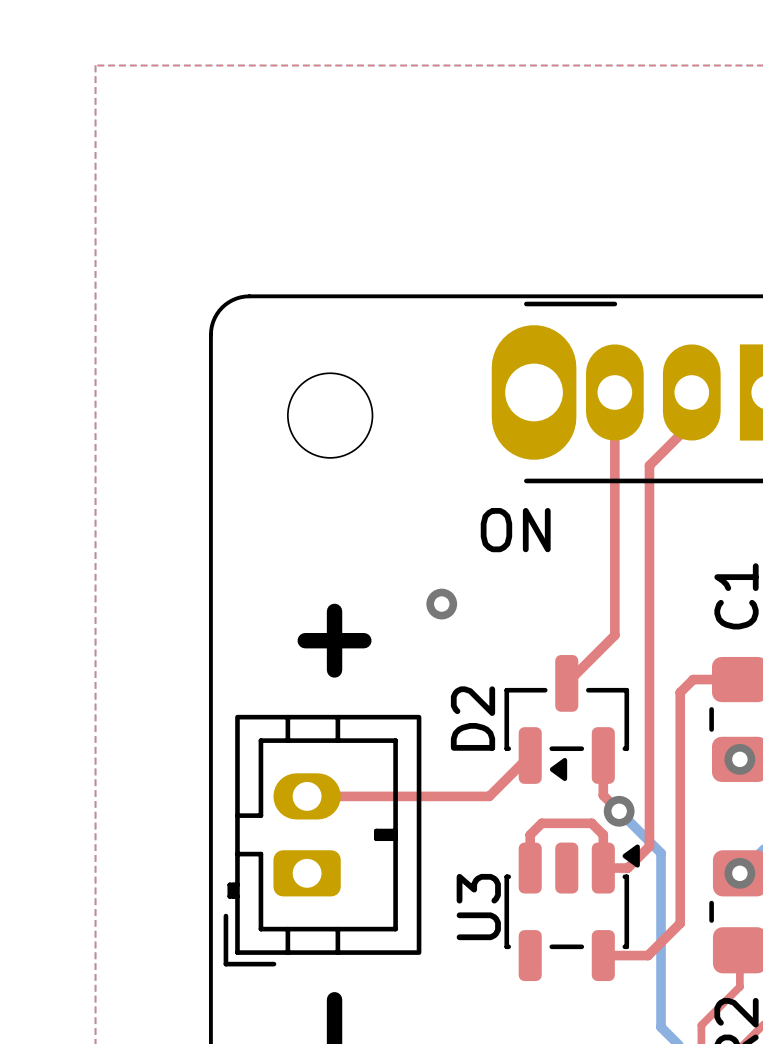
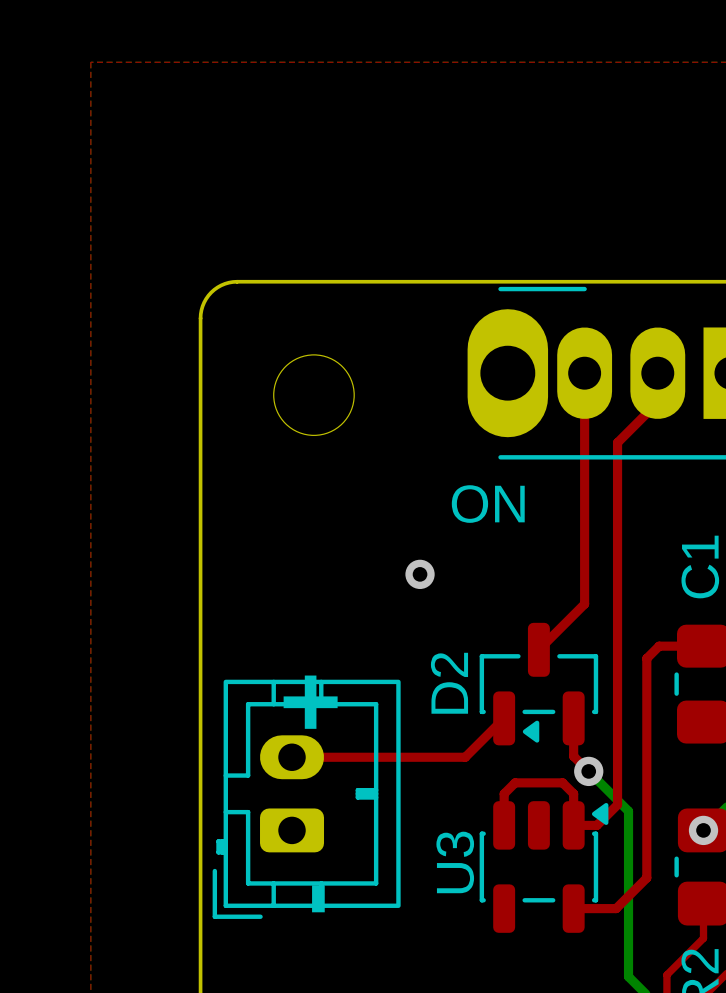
via: (739, 759) -> none

